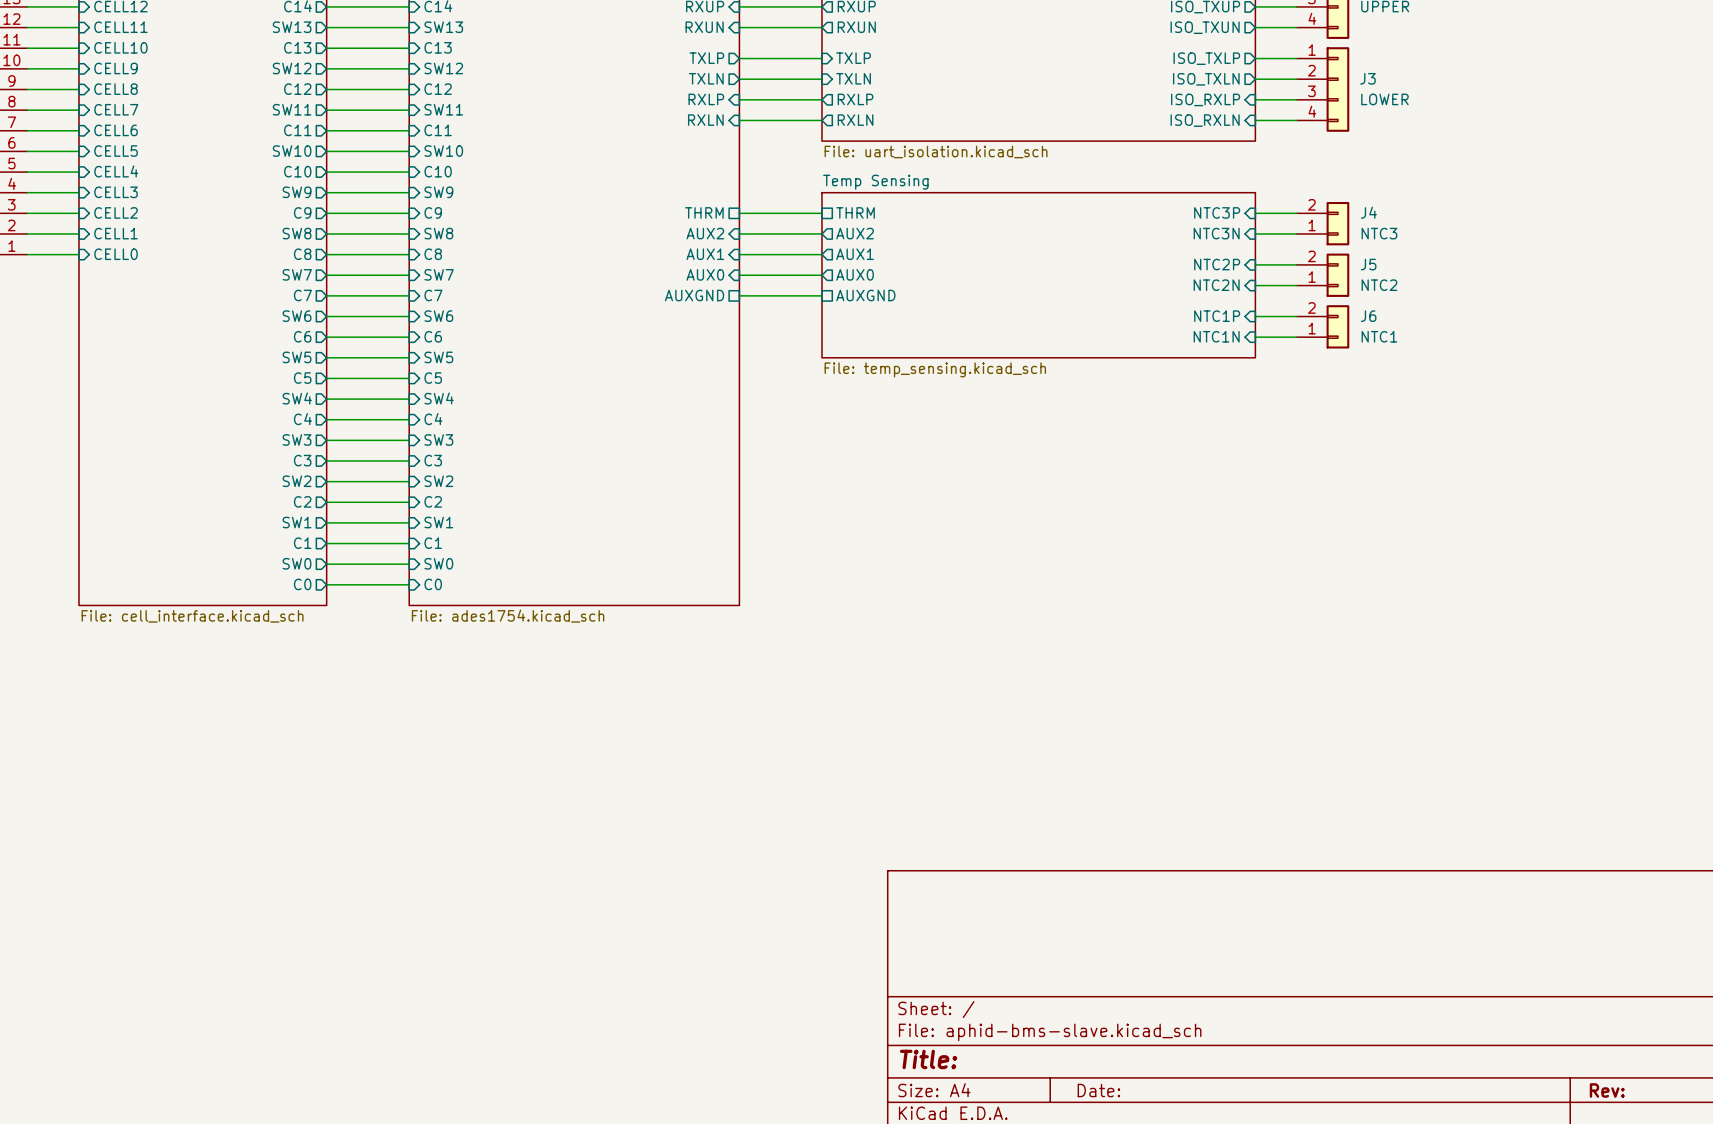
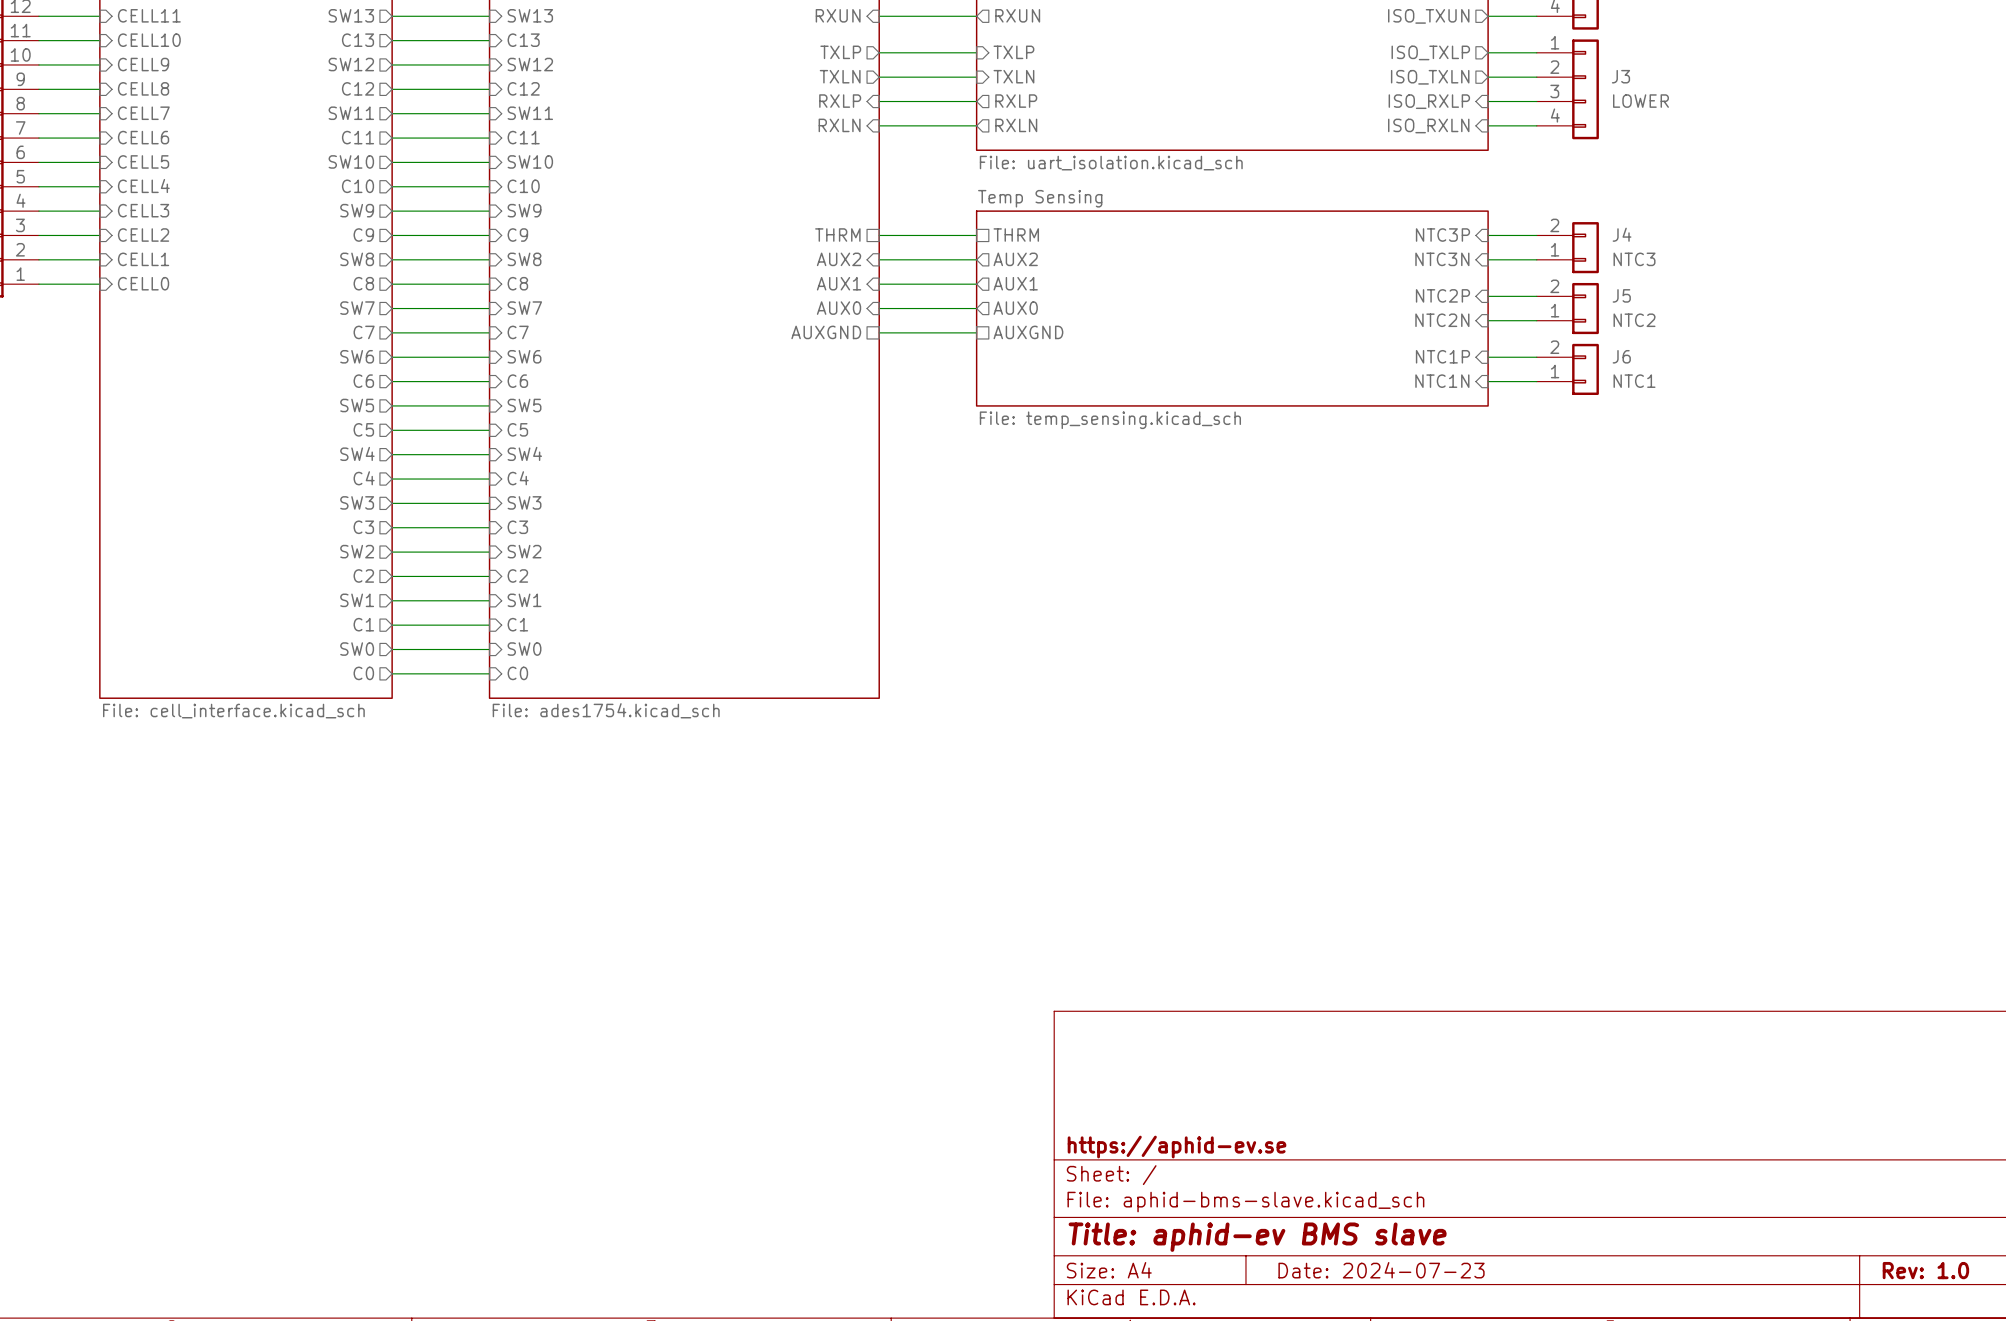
title block: none -> https://aphid-ev.se (1176, 1147)
title block: Title: (928, 1059) -> Title: aphid-ev BMS slave (1257, 1237)
title block: Date: (1098, 1090) -> Date: 2024-07-23 (1381, 1270)
title block: Rev: (1607, 1090) -> Rev: 1.0 (1925, 1270)

